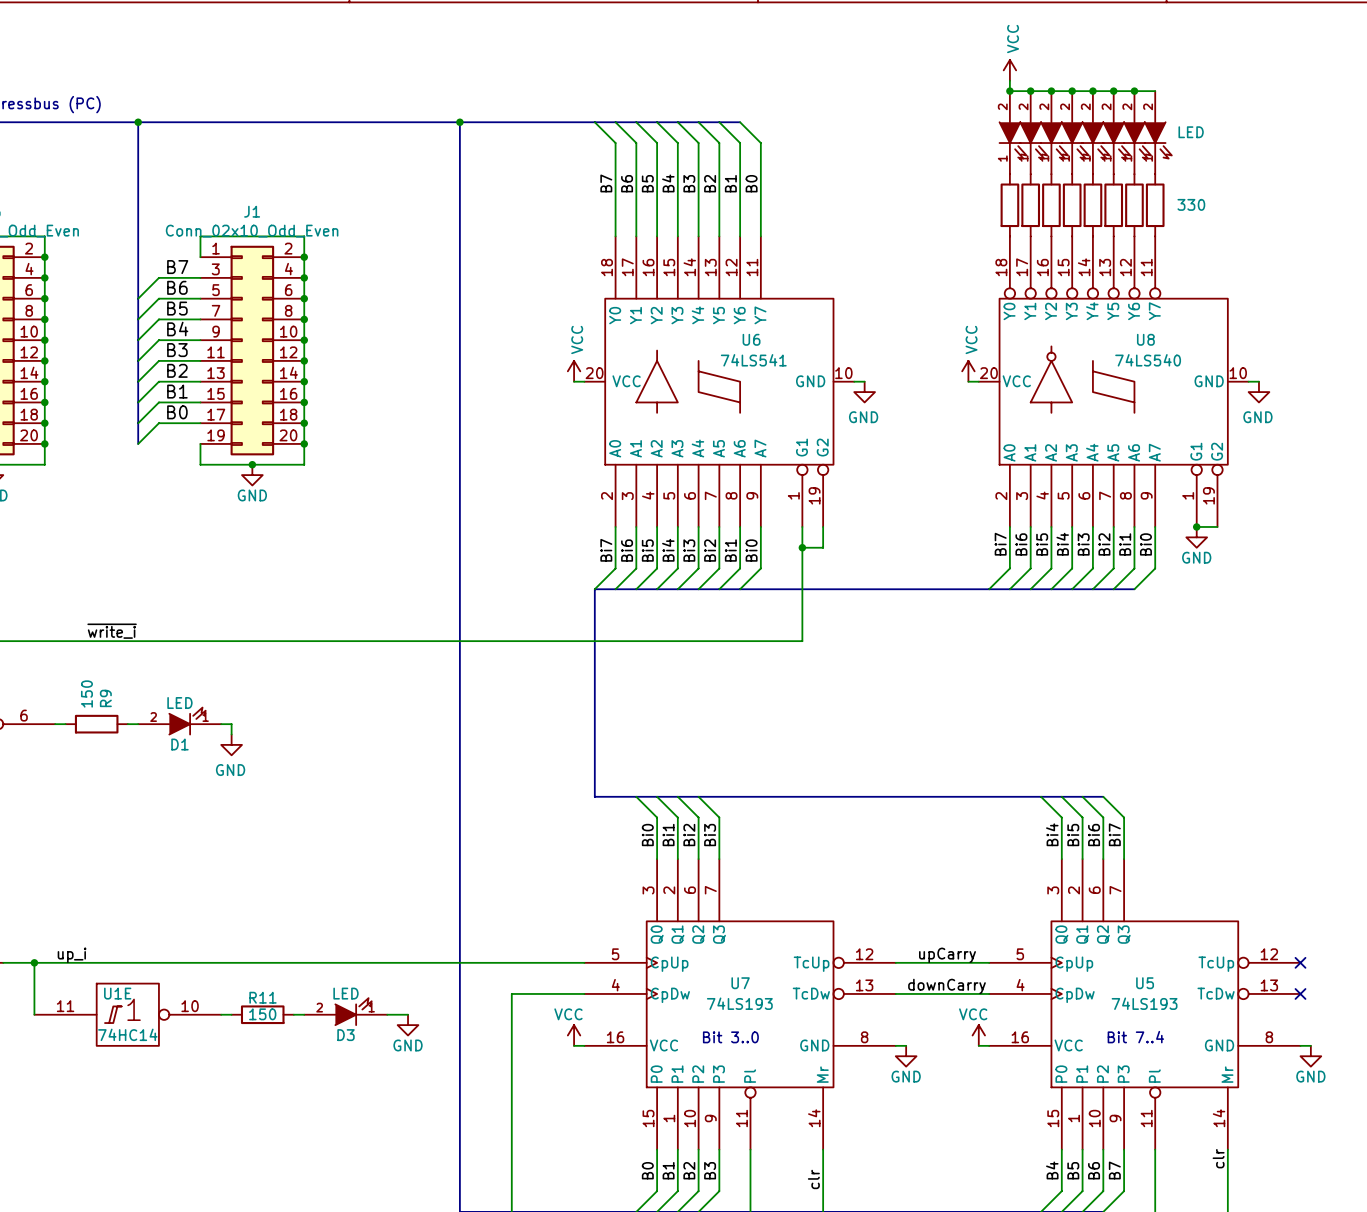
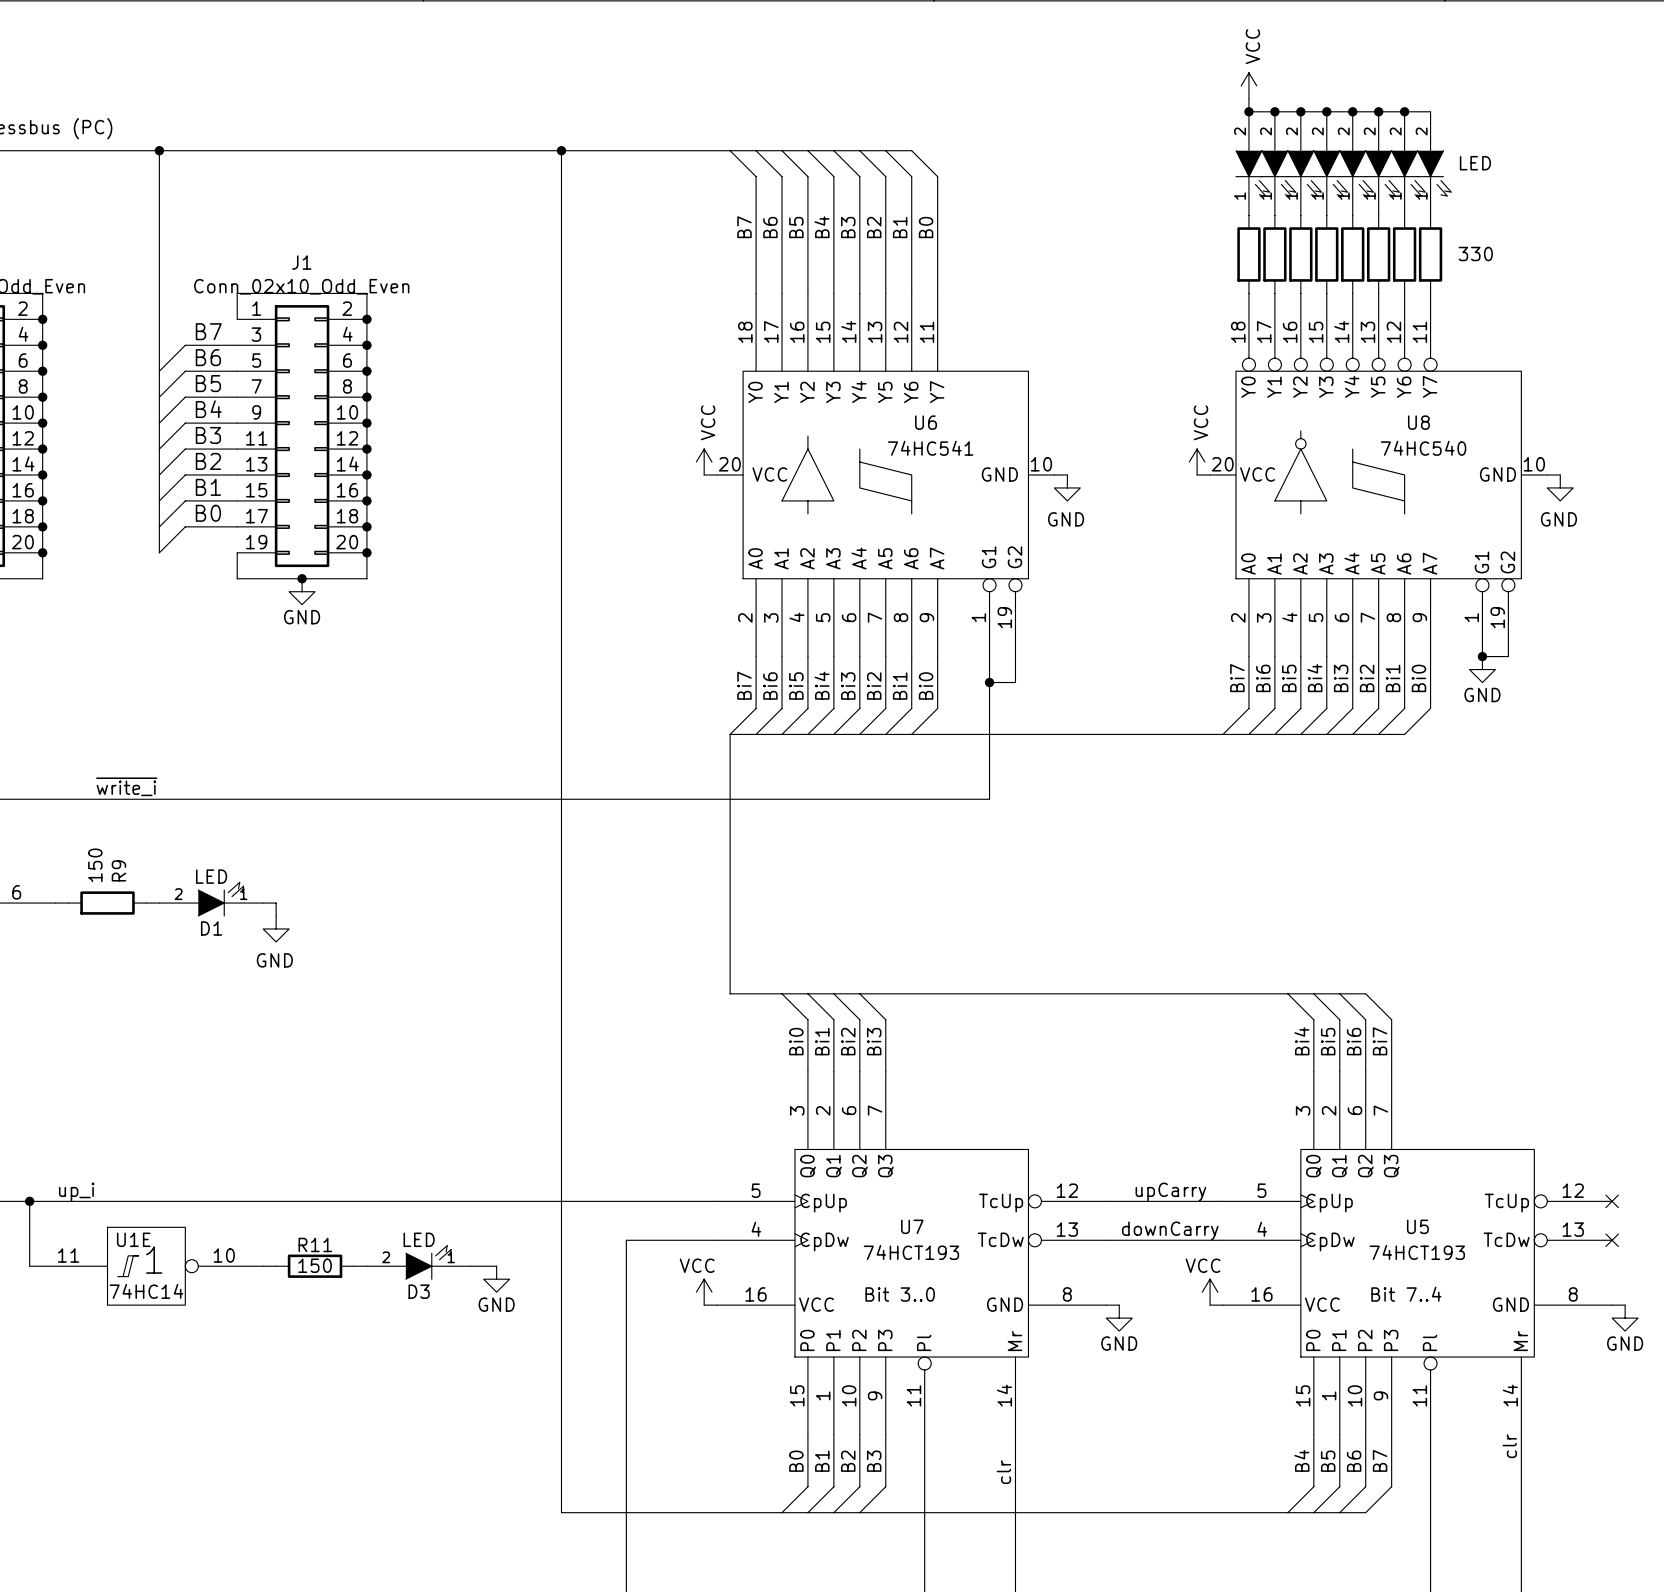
U6 value: 74LS541 (753, 360) -> 74HC541 (930, 448)
U8 value: 74LS540 (1148, 360) -> 74HC540 (1423, 448)
U7 value: 74LS193 (739, 1003) -> 74HCT193 (911, 1252)
U5 value: 74LS193 (1144, 1003) -> 74HCT193 (1417, 1252)

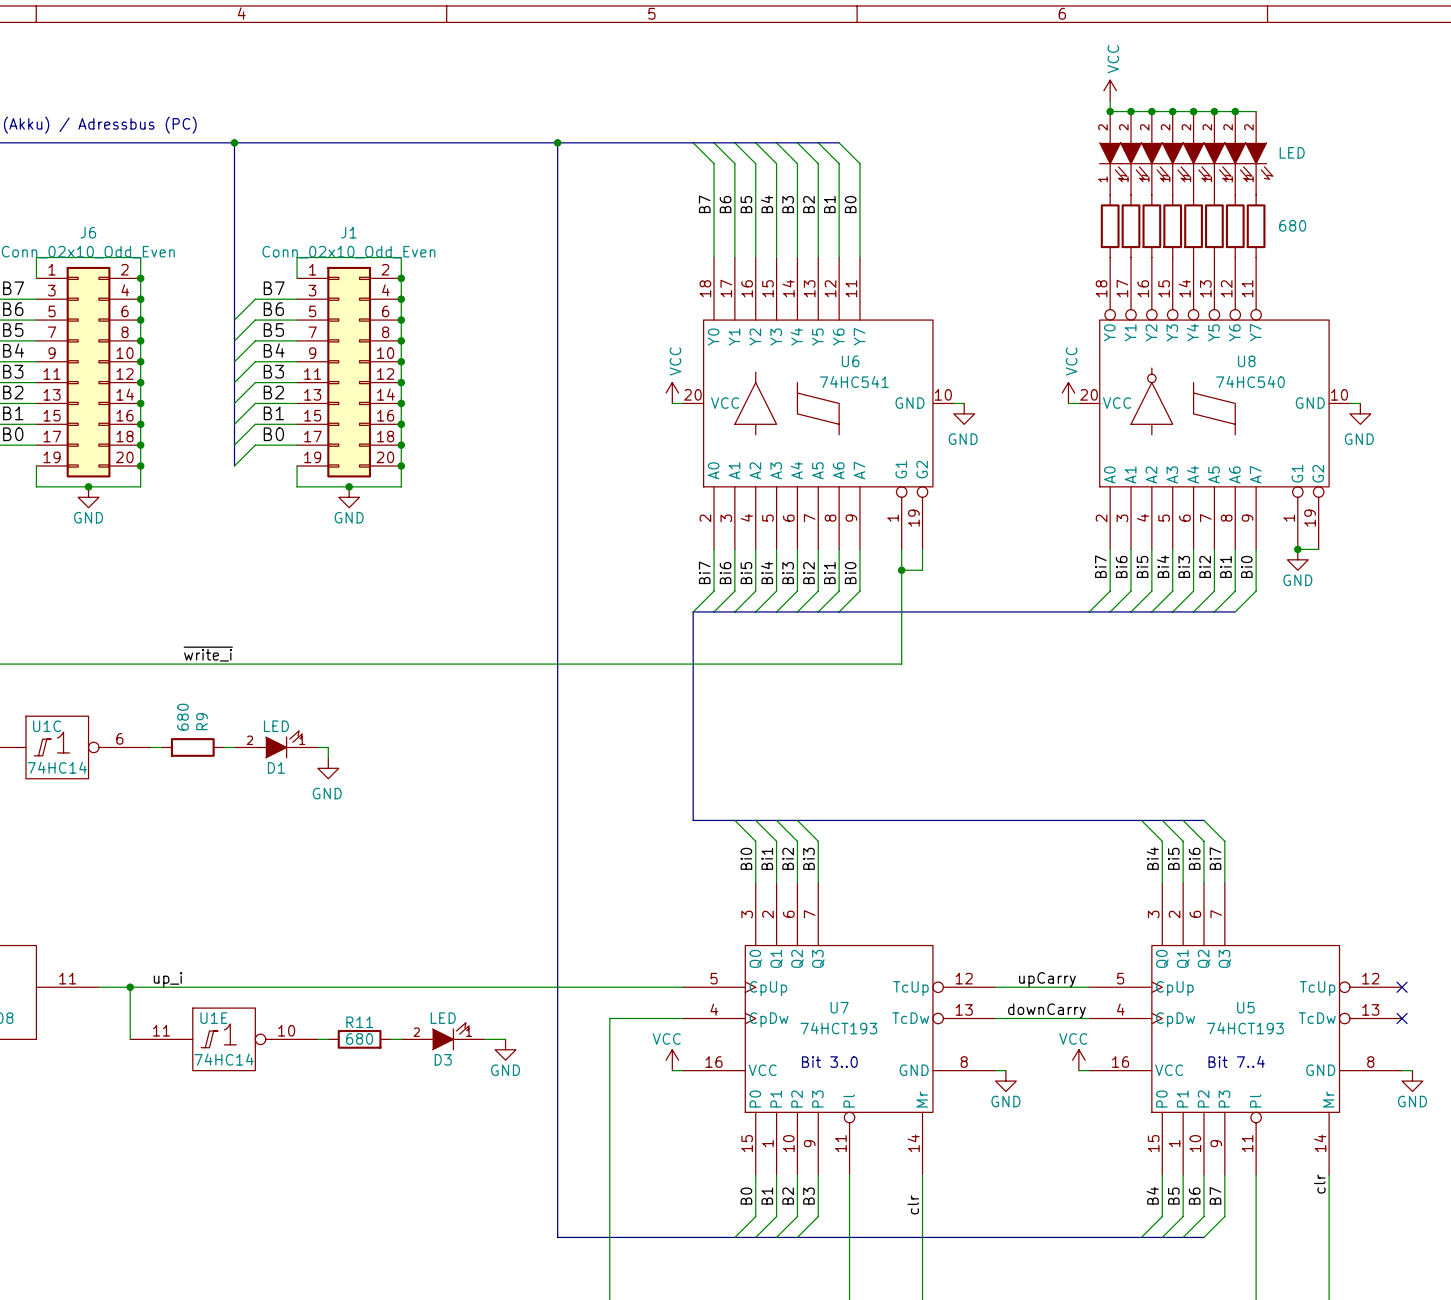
part value: 330 (1475, 253) -> 680 (1292, 225)
R9 value: 150 (95, 865) -> 680 (183, 717)
R11 value: 150 (315, 1265) -> 680 (359, 1038)

